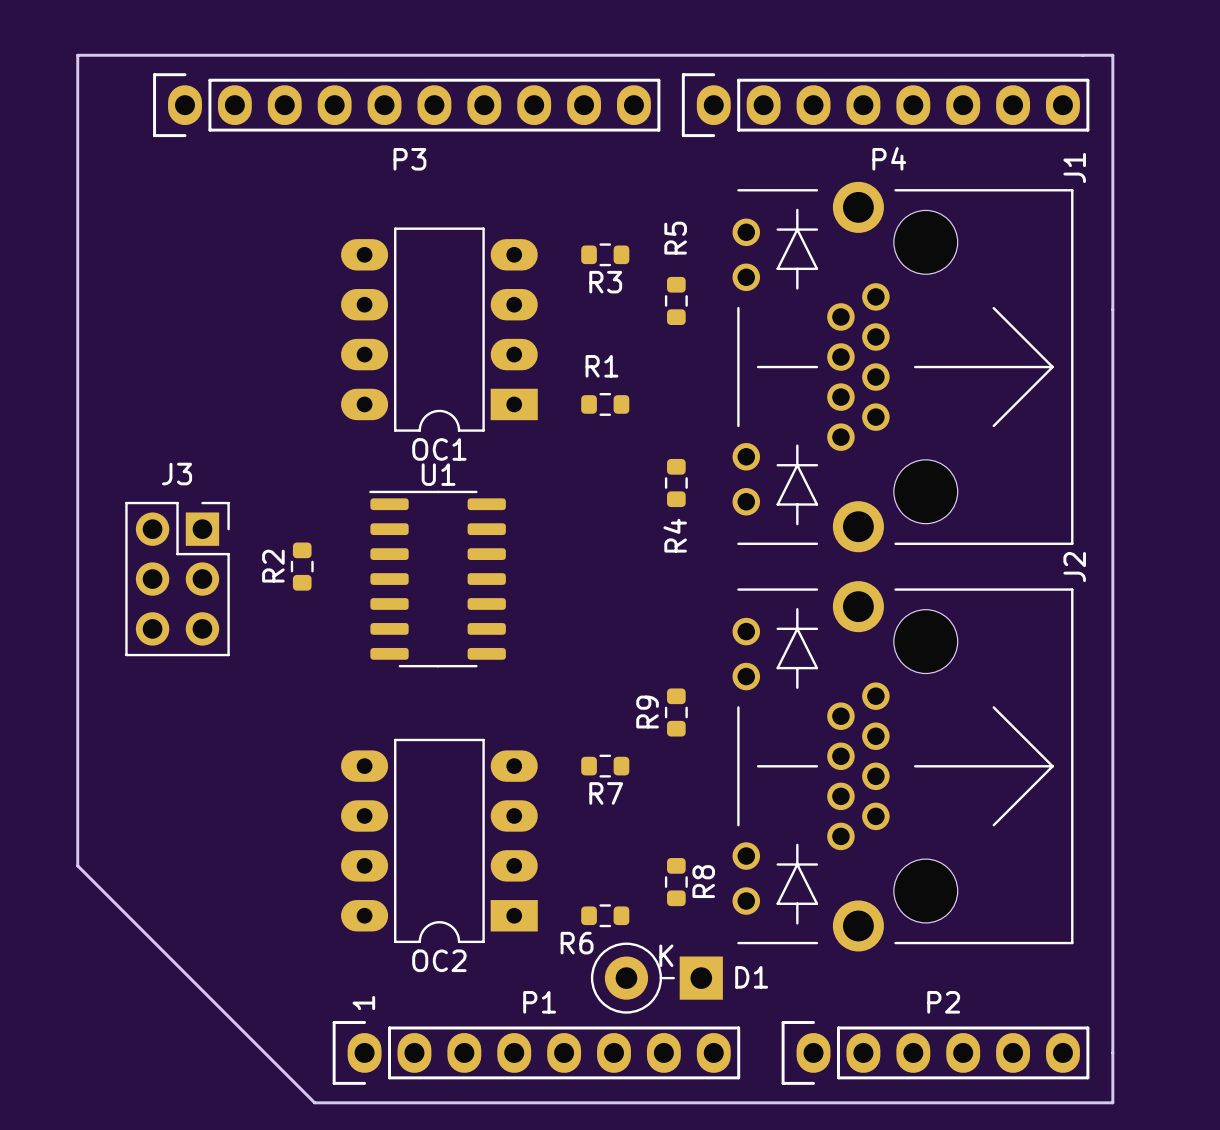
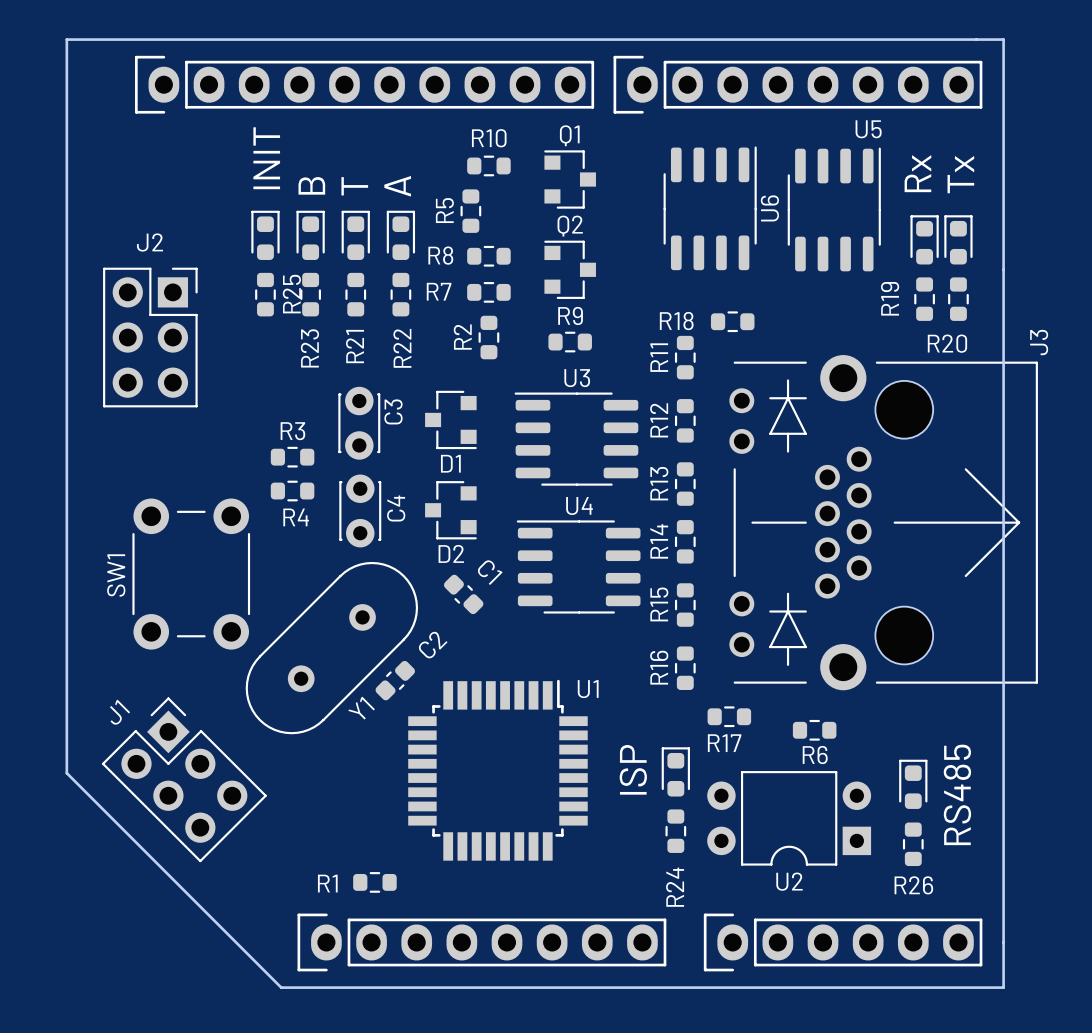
P4 name: P4 (889, 158) -> none
P3 name: P3 (409, 159) -> none
J1 name position: J1 (1074, 167) -> J1 (120, 712)
J1 footprint: [732, 181, 1074, 553] -> [101, 697, 267, 863]
text: none -> INIT (266, 158)
R10: none -> (488, 165)
text: none -> Rx (917, 173)
text: none -> Tx (960, 174)
Q1: none -> (570, 179)
text: none -> B (311, 185)
text: none -> T (354, 186)
text: none -> A (397, 186)
R5 name position: R5 (675, 238) -> R5 (444, 210)
U6: none -> (710, 208)
U5: none -> (834, 209)
R3 position: (605, 254) -> (292, 457)
part: none -> (265, 235)
part: none -> (310, 235)
part: none -> (355, 235)
part: none -> (400, 235)
part: none -> (924, 239)
part: none -> (958, 239)
R3 name position: R3 (605, 282) -> R3 (292, 431)
R5 position: (676, 300) -> (470, 211)
Q2: none -> (570, 269)
OC1: (439, 329) -> none
R25: none -> (265, 294)
R23: none -> (310, 294)
R21: none -> (355, 294)
R22: none -> (400, 294)
R19: none -> (924, 299)
R20: none -> (958, 299)
R1 name position: R1 (601, 366) -> R1 (327, 883)
R18: none -> (732, 321)
R1 position: (605, 404) -> (374, 882)
R11: none -> (685, 357)
J3 name position: J3 (177, 474) -> J3 (1039, 342)
U1 name position: U1 (438, 474) -> U1 (588, 689)
R12: none -> (685, 420)
C3: none -> (359, 423)
R4 rotation: 0° (676, 483) -> 90° clockwise (292, 491)
R4 position: (676, 483) -> (292, 491)
U1 footprint: [369, 490, 506, 668] -> [408, 679, 588, 861]
U3: none -> (576, 439)
J3 footprint: [125, 501, 230, 657] -> [729, 355, 1038, 691]
R13: none -> (685, 484)
R2 position: (302, 566) -> (488, 337)
J2 name position: J2 (1074, 567) -> J2 (149, 242)
D2: none -> (450, 510)
C4: none -> (360, 510)
J2 footprint: [732, 581, 1074, 952] -> [103, 267, 198, 408]
R14: none -> (685, 541)
U4: none -> (578, 566)
SW1: none -> (191, 574)
C1: none -> (463, 594)
R15: none -> (685, 605)
R9 rotation: 0° (676, 712) -> 90° clockwise (570, 342)
R9 position: (676, 712) -> (570, 342)
Y1: none -> (331, 648)
R16: none -> (685, 668)
C2: none -> (395, 680)
R7 position: (605, 766) -> (488, 292)
R7 name position: R7 (606, 793) -> R7 (439, 291)
R17: none -> (729, 716)
OC2: (439, 840) -> none
text: none -> ISP (633, 769)
part: none -> (675, 771)
part: none -> (913, 784)
R8 name position: R8 (703, 881) -> R8 (440, 255)
R8 rotation: 0° (676, 882) -> 90° clockwise (488, 256)
R8 position: (676, 882) -> (488, 256)
text: none -> RS485 (957, 794)
R6 position: (605, 915) -> (814, 730)
U2: none -> (789, 818)
R24: none -> (675, 831)
D1 footprint: [590, 942, 723, 1014] -> [425, 390, 477, 450]
R6 name position: R6 (577, 943) -> R6 (815, 755)
R26: none -> (913, 844)
D1 name position: D1 (751, 977) -> D1 (450, 463)
P1 name: P1 (539, 1002) -> none
P2 name: P2 (943, 1002) -> none
text: 1 (363, 1003) -> none

